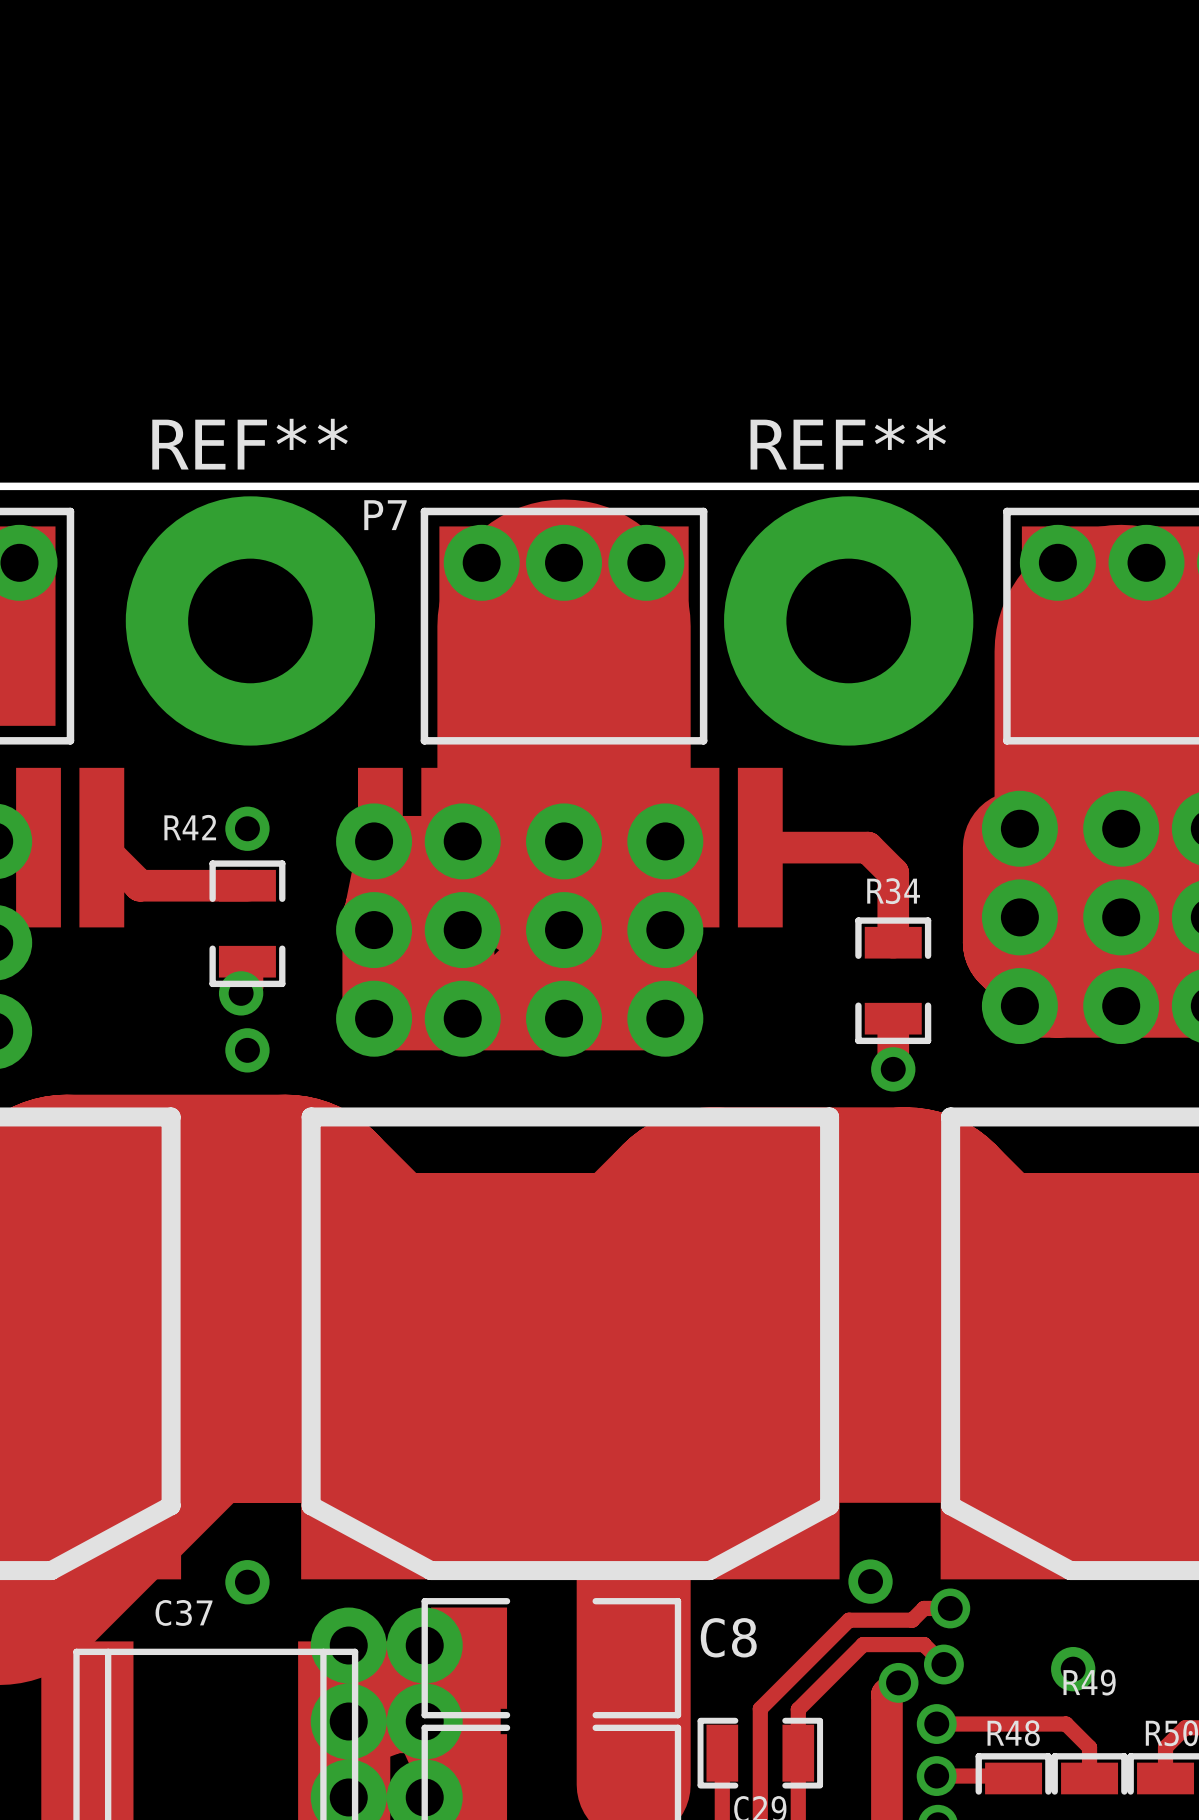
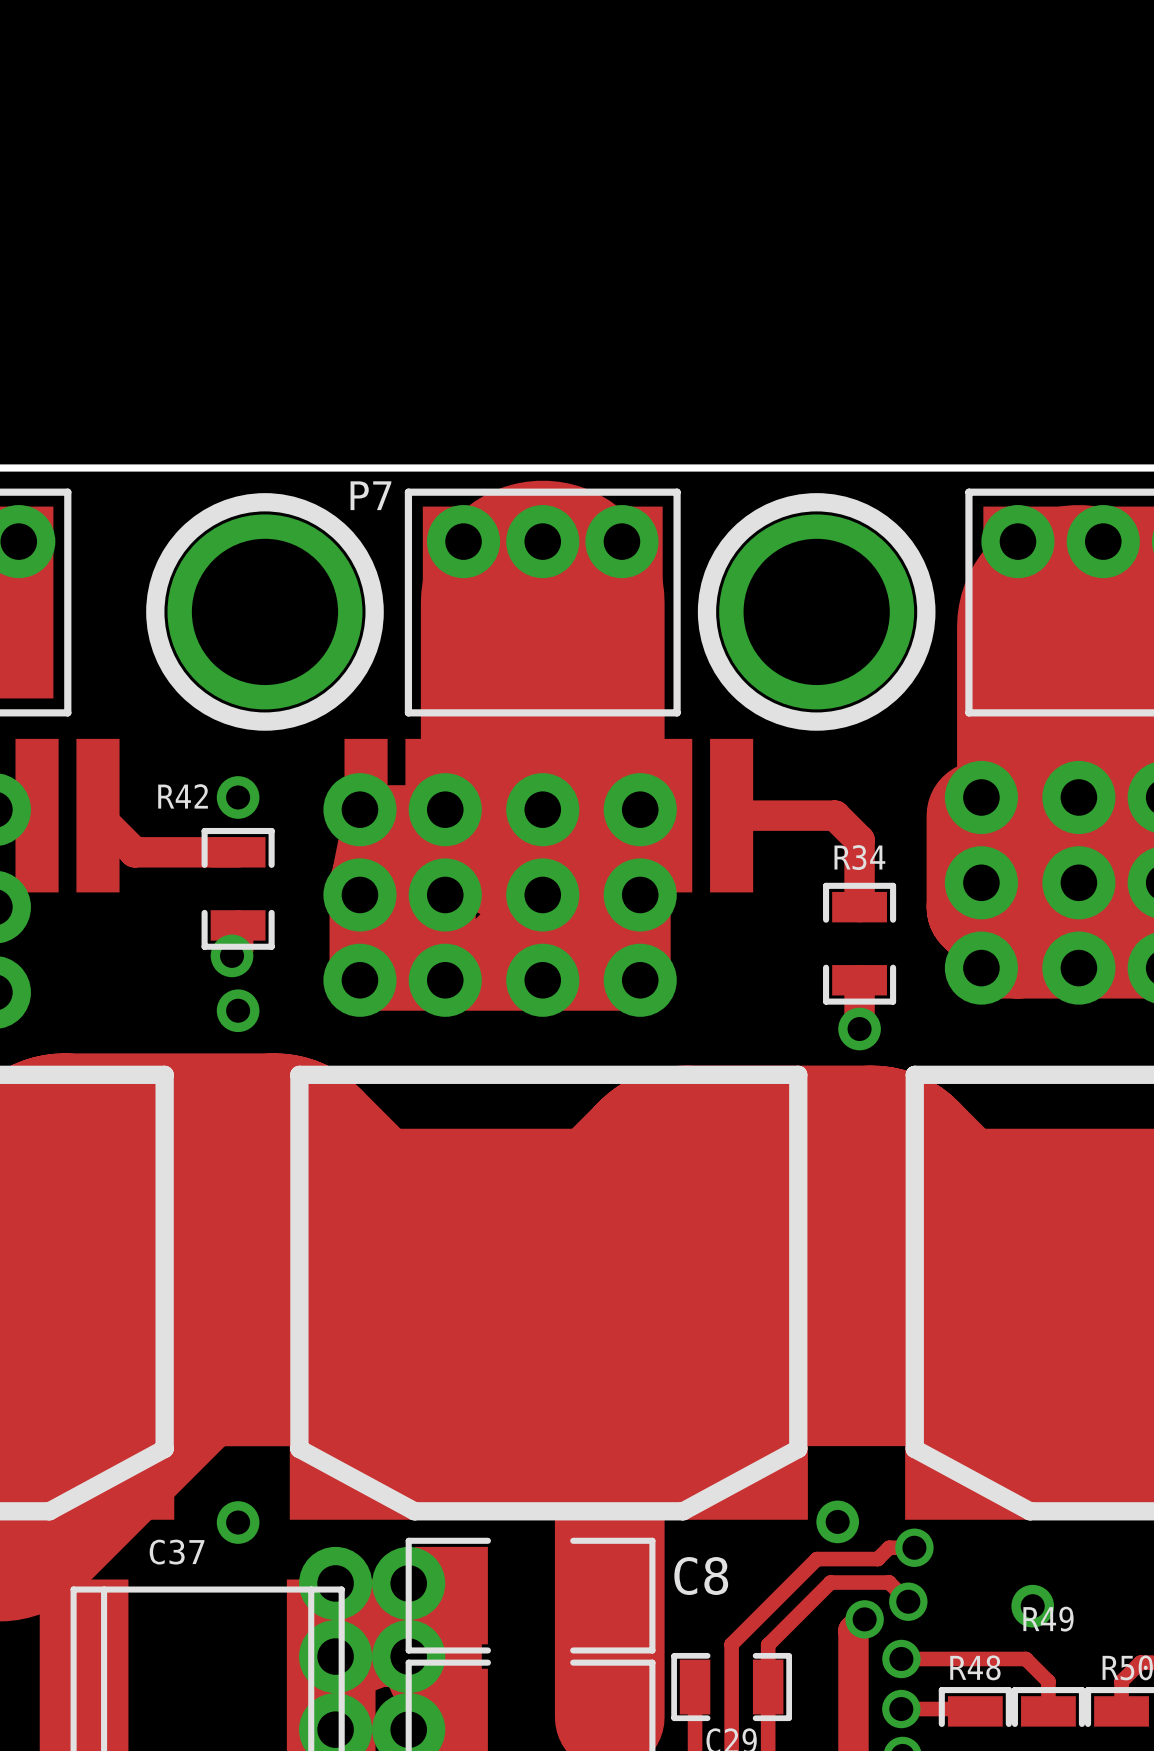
REF**: (250, 620) -> none
REF**: (848, 620) -> none
part: none -> (264, 611)
part: none -> (816, 611)

